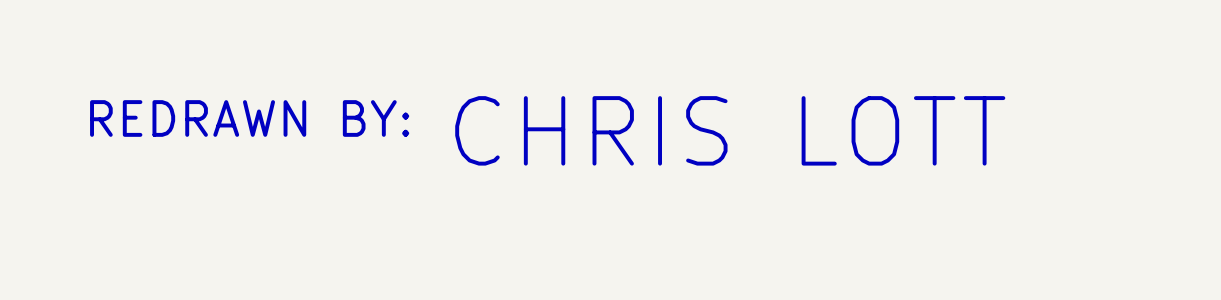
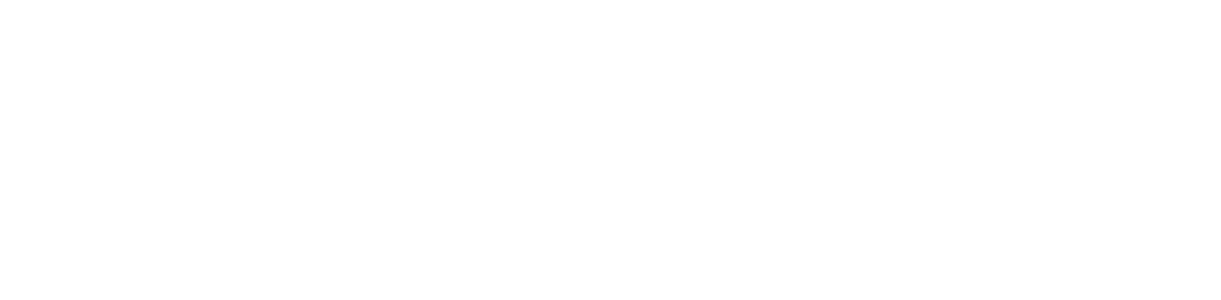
text: REDRAWN BY: (249, 118) -> none
text: CHRIS LOTT (730, 130) -> none

